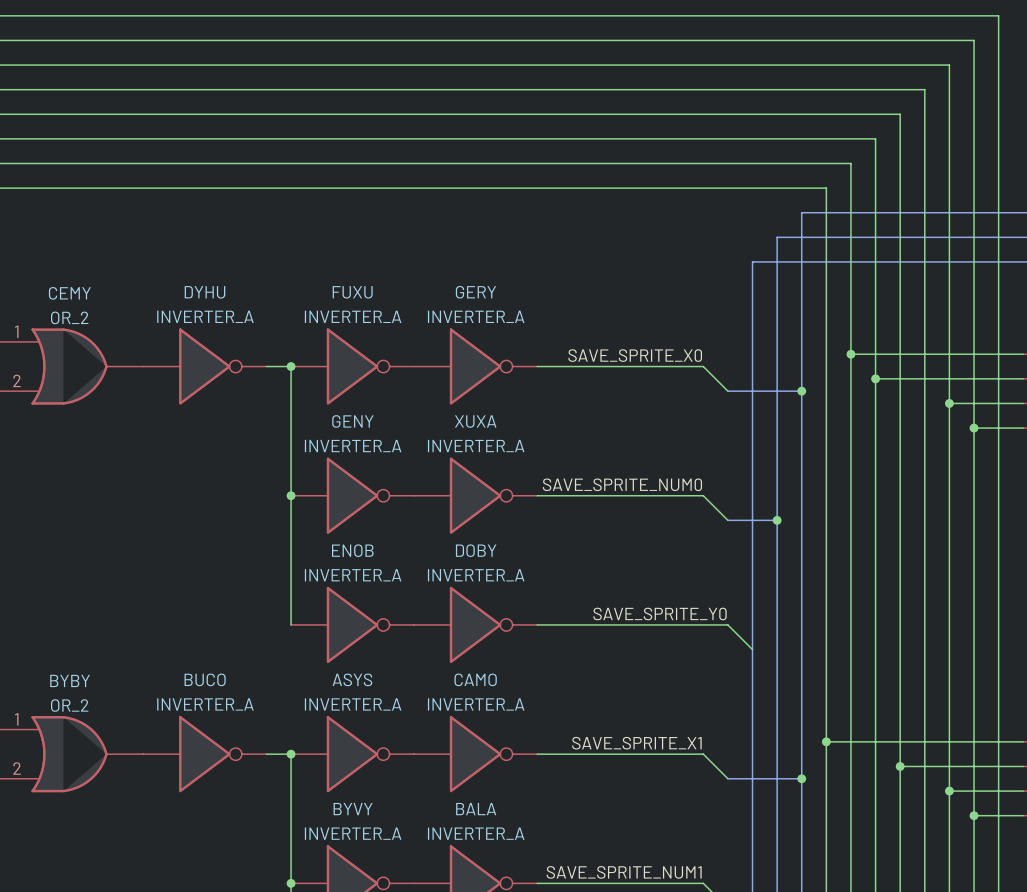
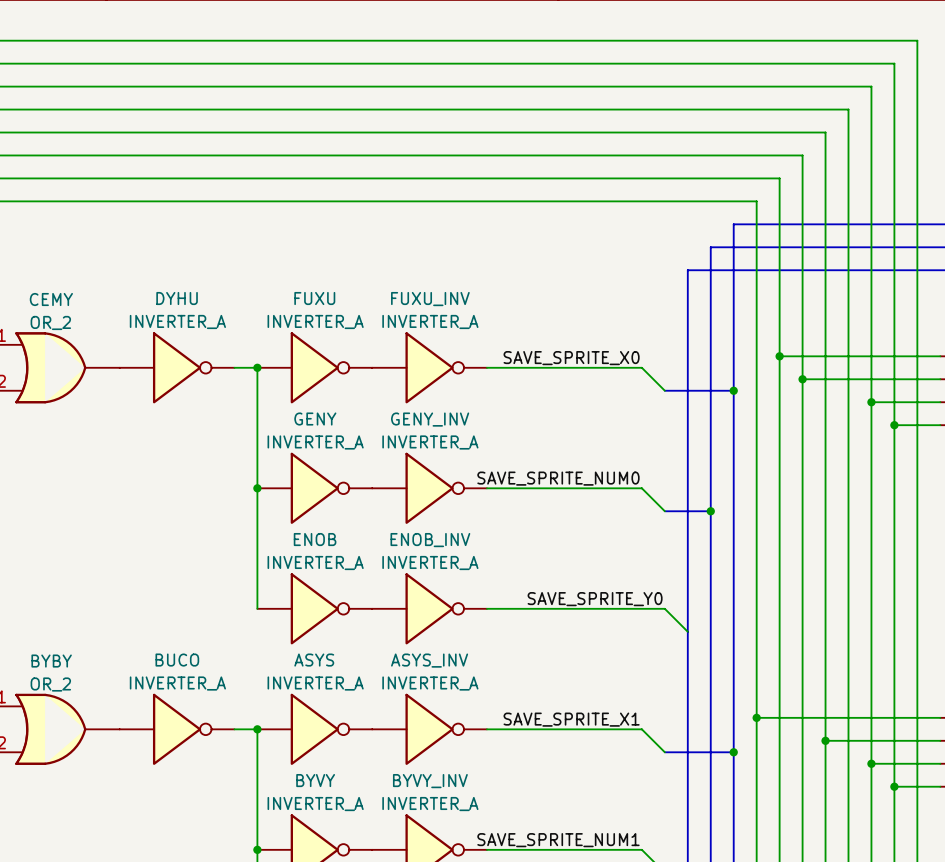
GERY name: GERY (475, 292) -> FUXU_INV (430, 299)
XUXA name: XUXA (475, 421) -> GENY_INV (430, 419)
DOBY name: DOBY (476, 550) -> ENOB_INV (430, 540)
CAMO name: CAMO (475, 679) -> ASYS_INV (429, 660)
BALA name: BALA (476, 809) -> BYVY_INV (430, 781)

